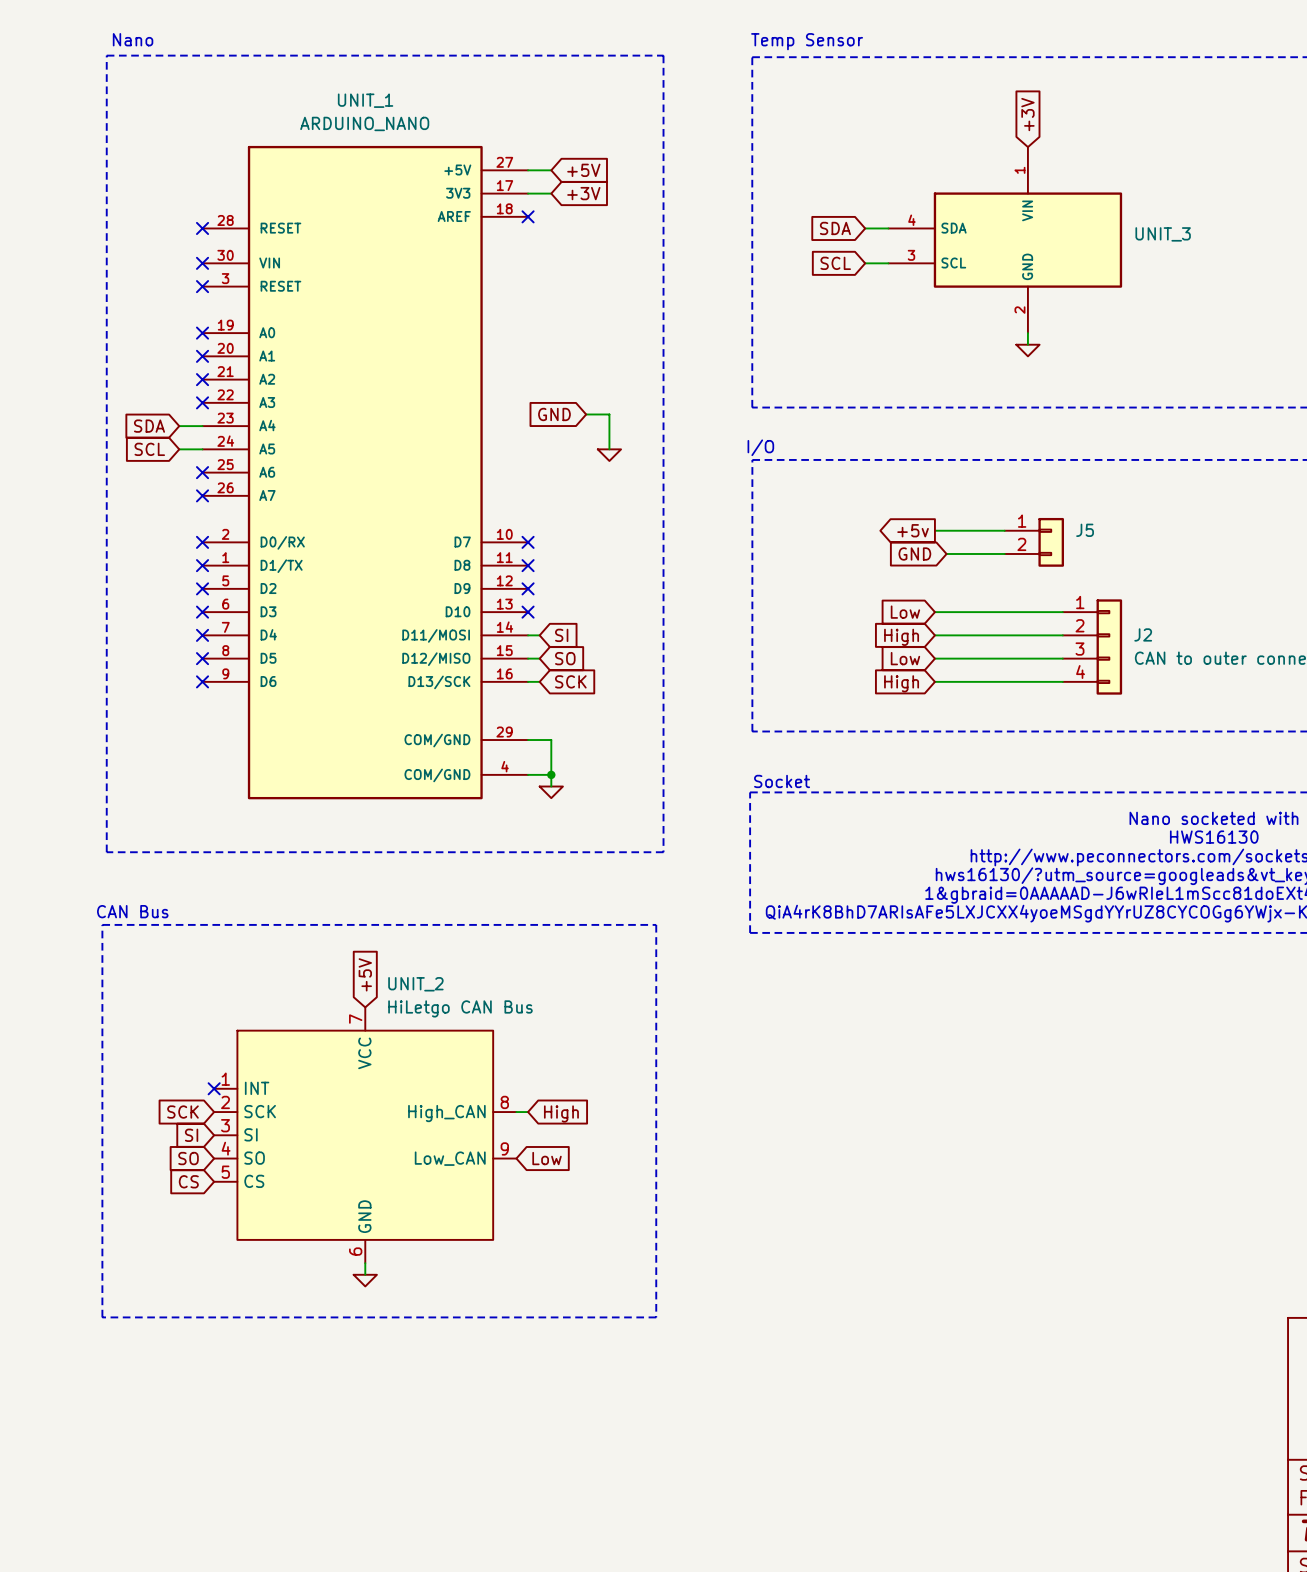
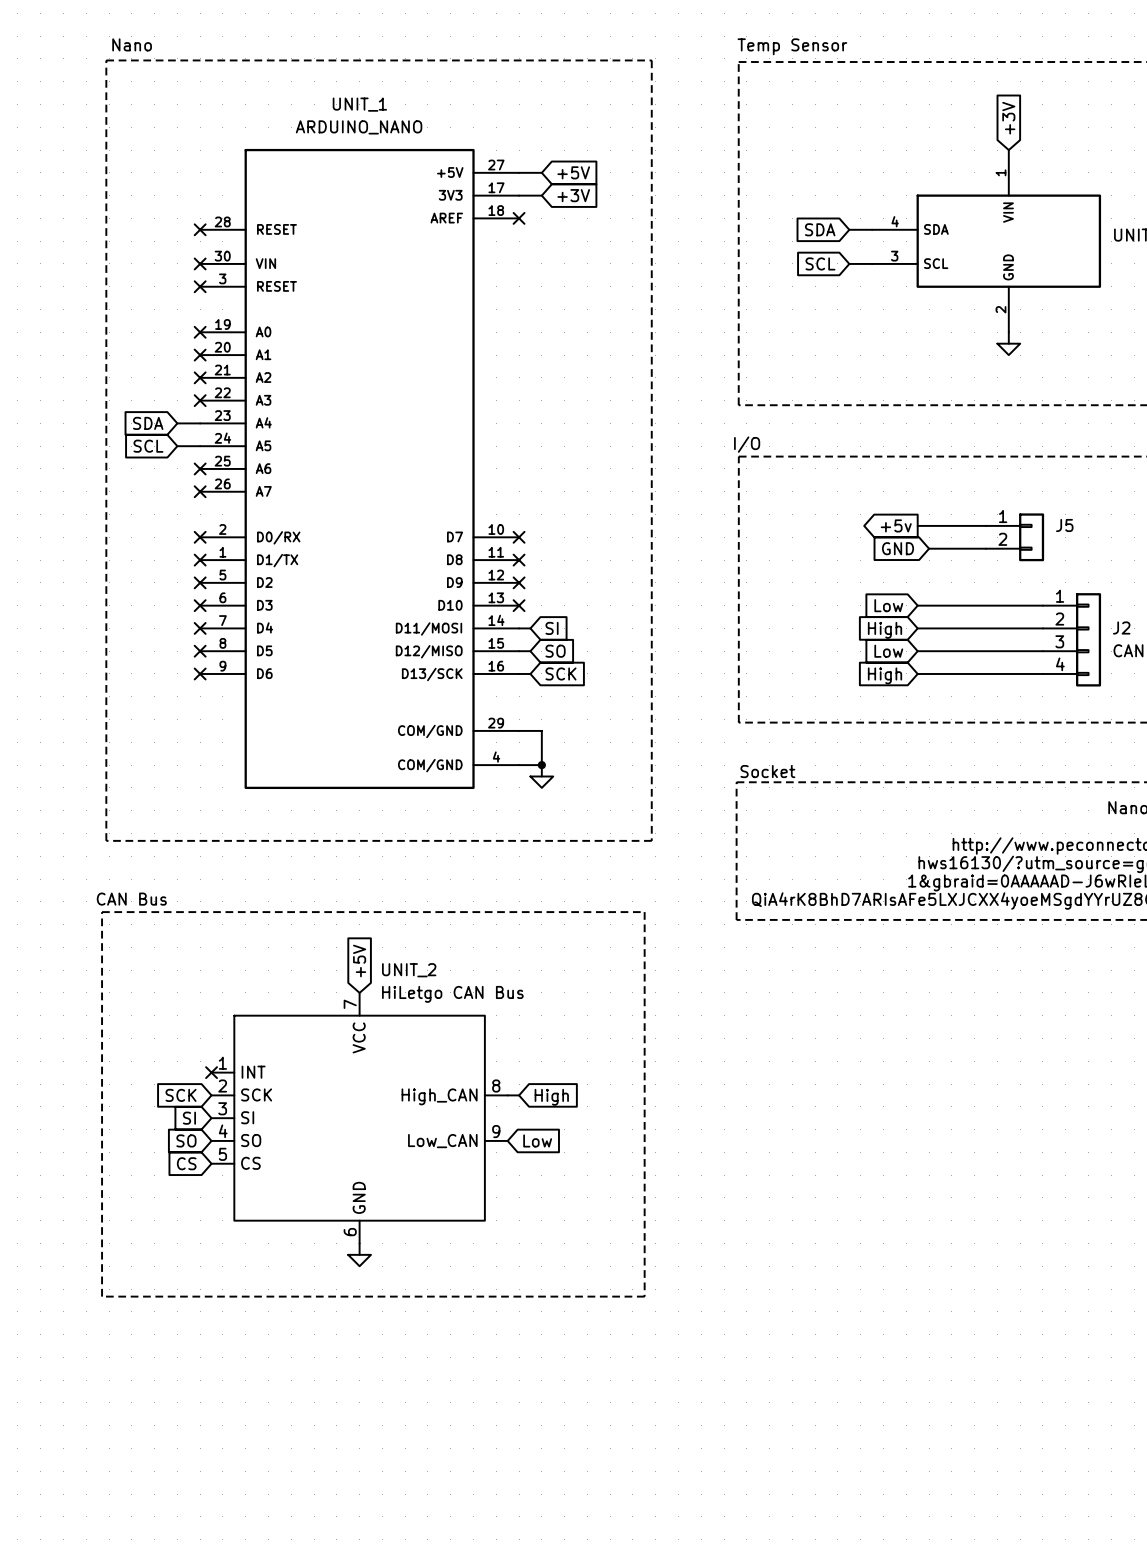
global label: GND (554, 414) -> none
wire: (586, 414) (609, 414) (609, 449) -> none
power symbol: (609, 455) -> none

